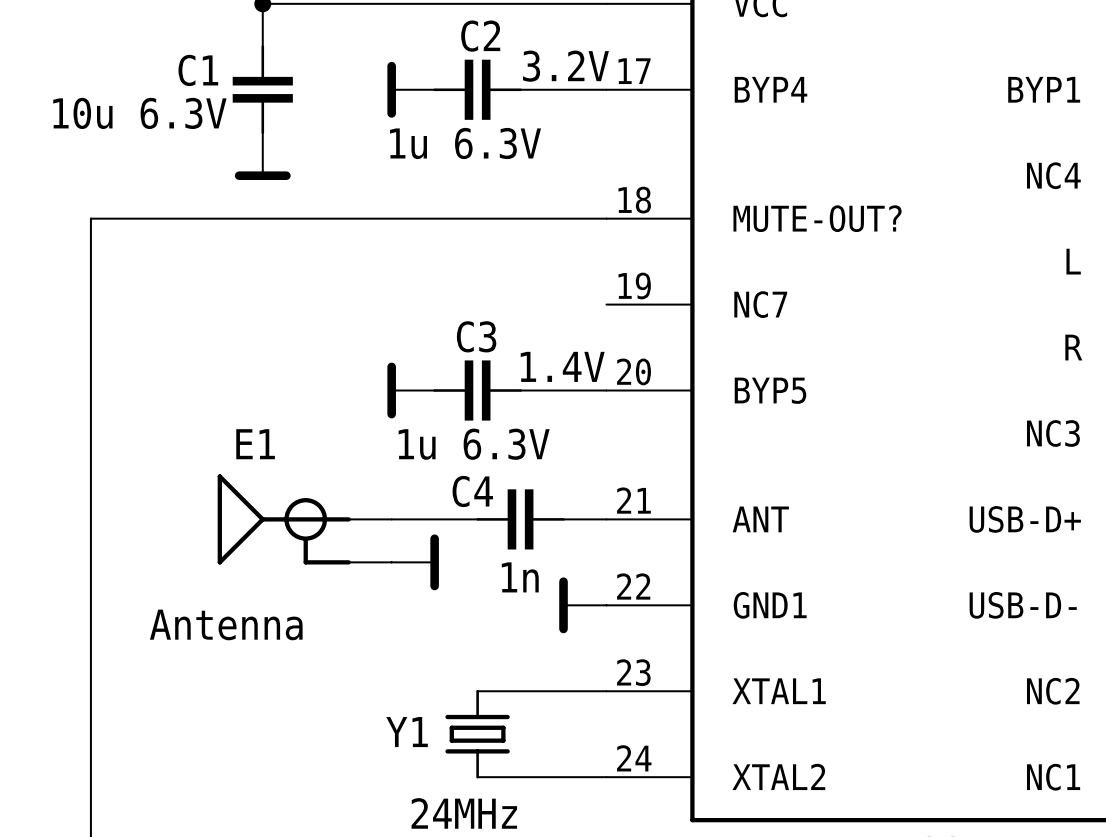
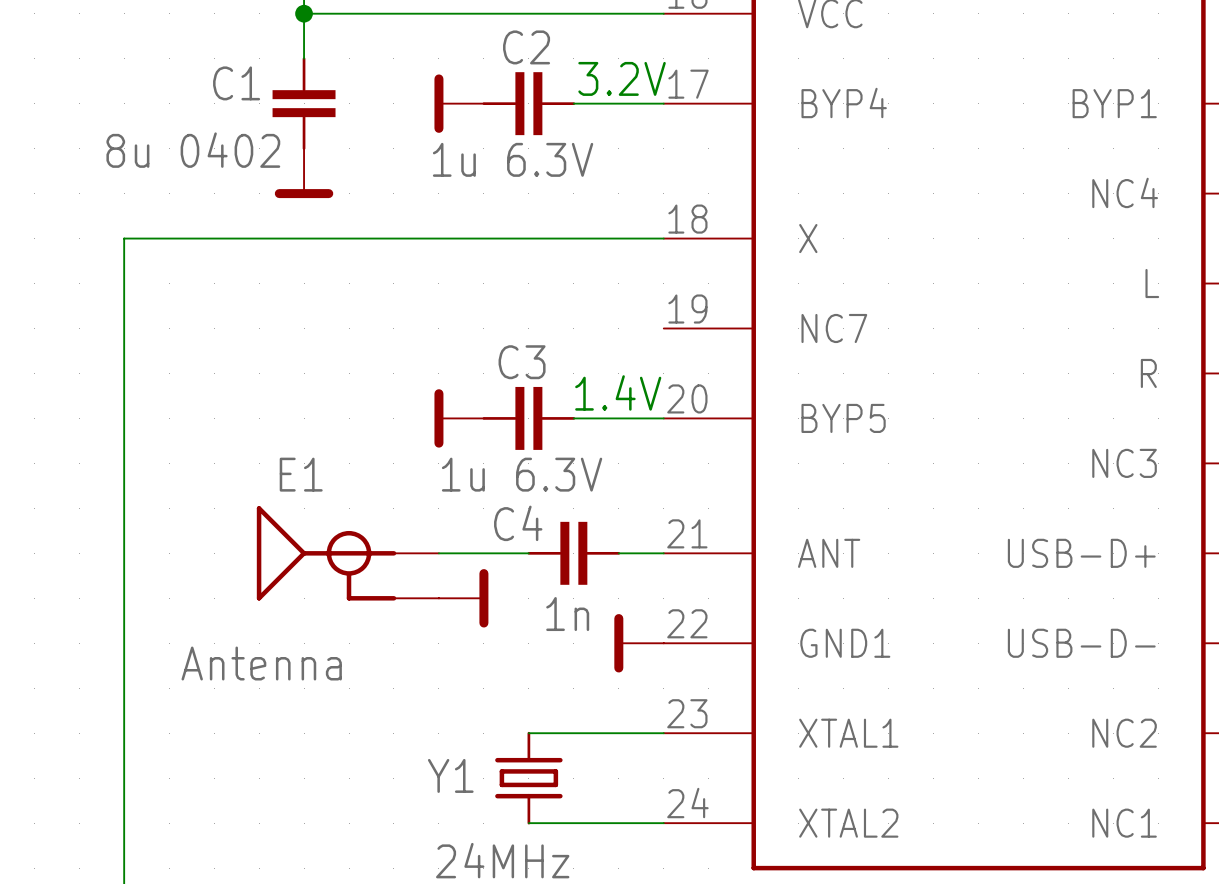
C1 value: 10u 6.3V (139, 113) -> 8u 0402 (193, 150)
part pin name: MUTE-OUT? (817, 218) -> X (808, 238)

